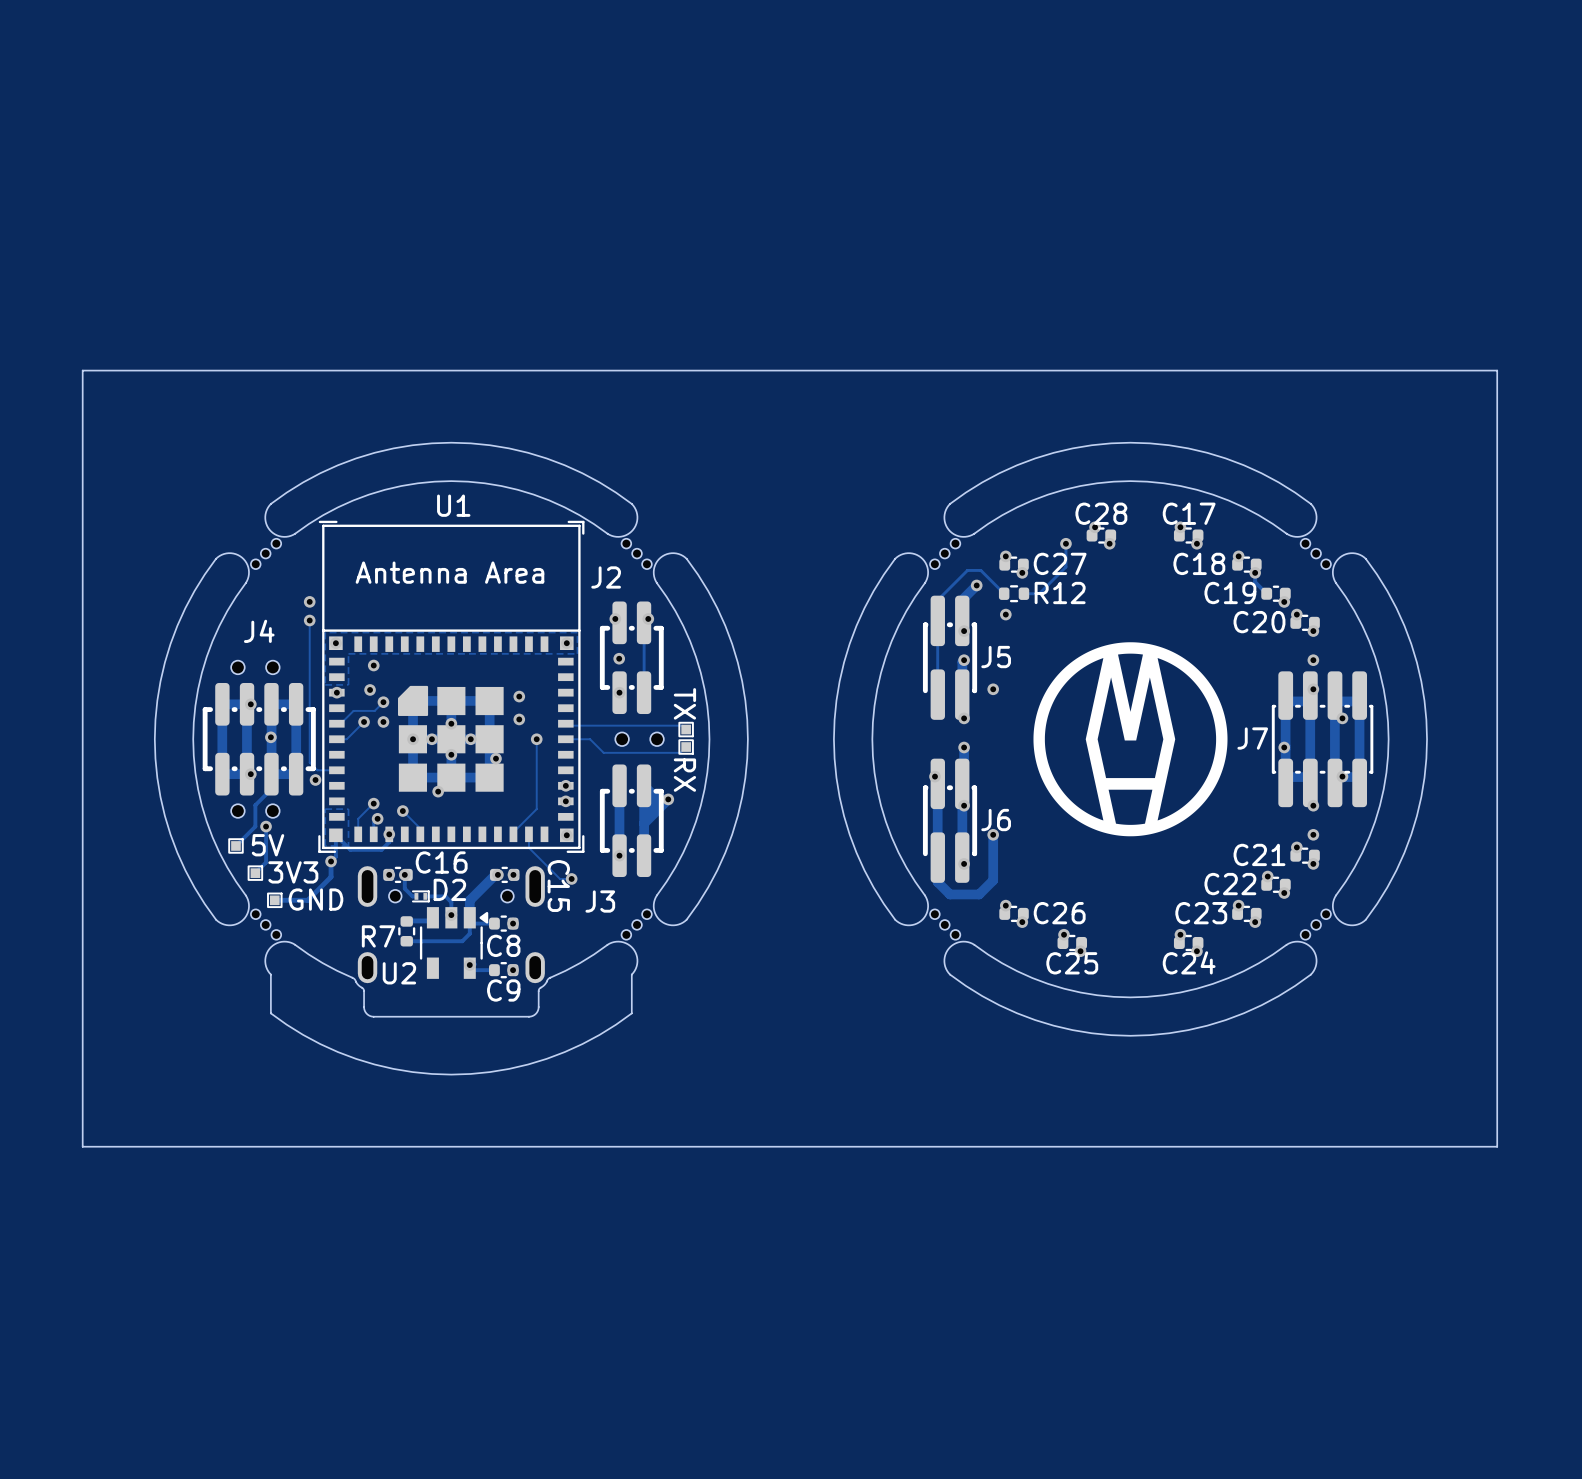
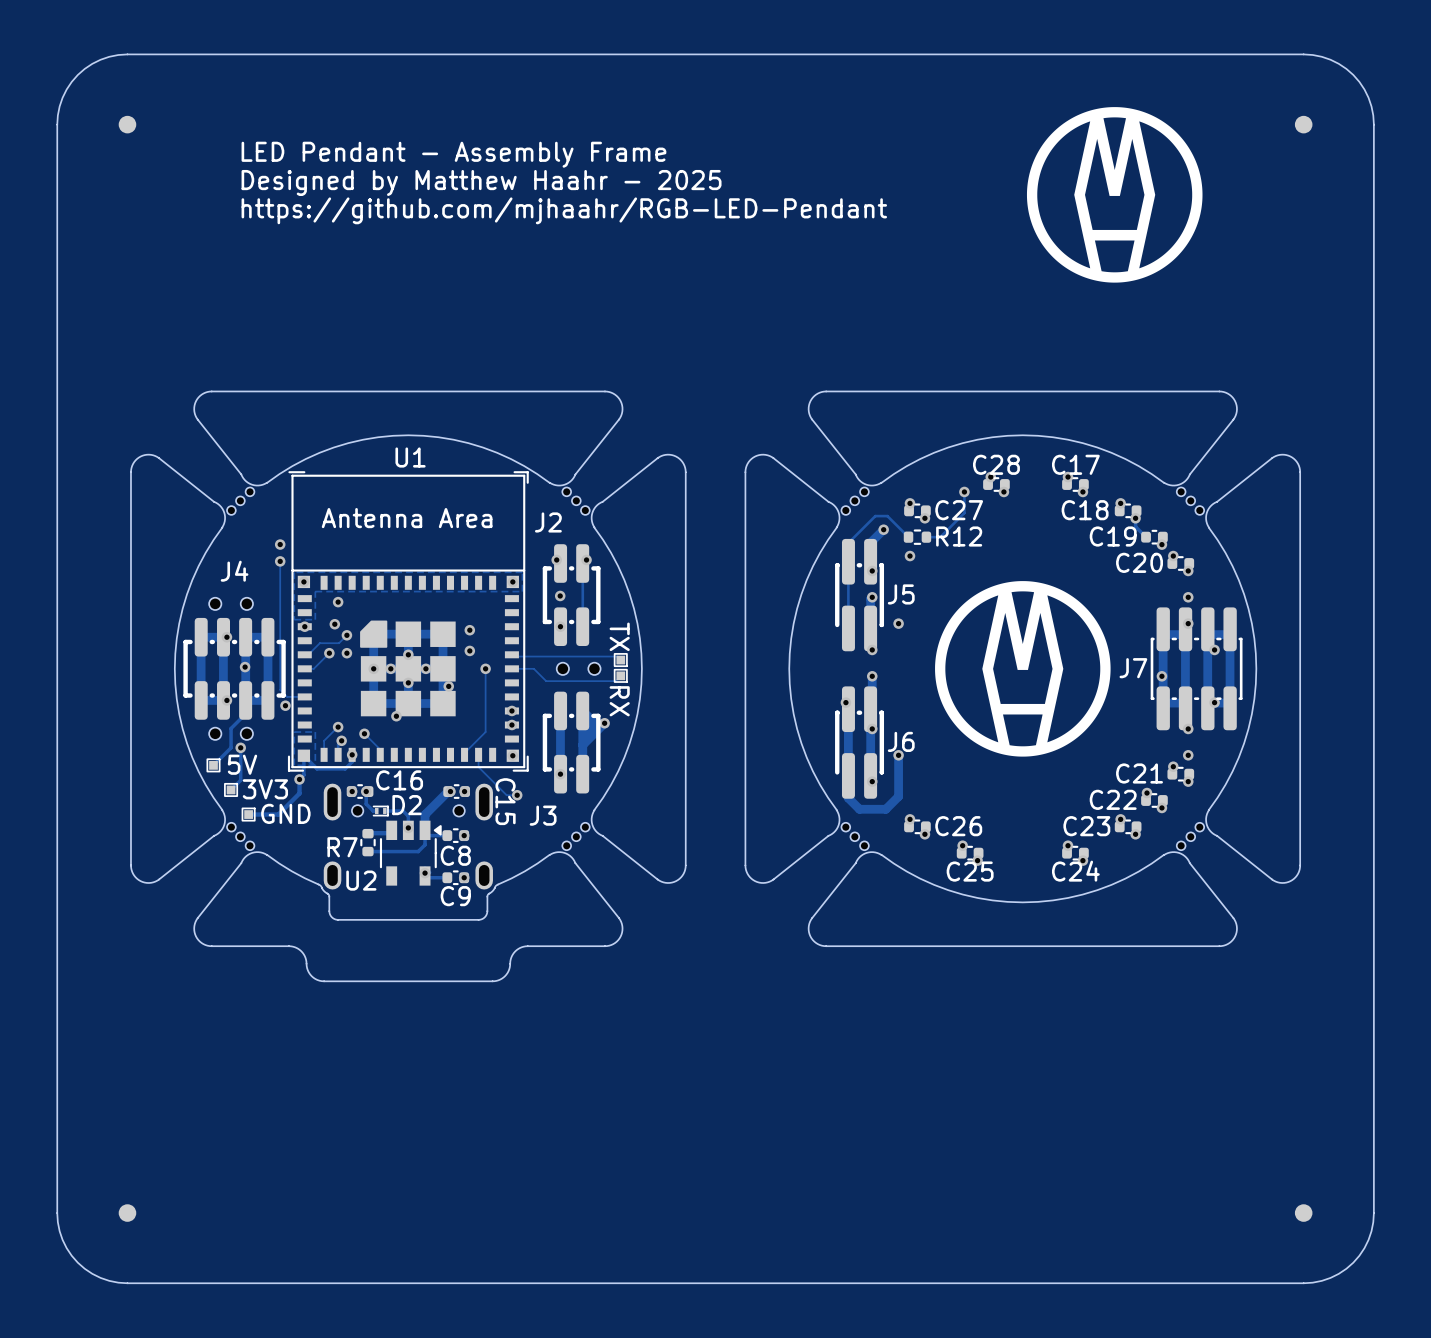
drawing: none -> [1026, 107, 1203, 283]
part: none -> (127, 124)
part: none -> (1303, 124)
text: none -> LED Pendant - Assembly Frame (453, 154)
text: none -> Designed by Matthew Haahr - 2025 (481, 182)
text: none -> https://github.com/mjhaahr/RGB-LED-Pendant (564, 210)
board edge: (1497, 370) (82, 370) (82, 1146) (1497, 1146) (1497, 370) -> (1303, 54) (1330, 59) (1353, 74) (1368, 97) (1373, 124) (1373, 1213) (1368, 1239) (1353, 1262) (1330, 1277) (1303, 1283) (127, 1283) (100, 1277) (77, 1262) (62, 1239) (57, 1213) (57, 124) (62, 97) (77, 74) (100, 59) (127, 54) (1303, 54)
part footprint: [215, 503, 296, 584] -> [213, 474, 268, 528]
part footprint: [607, 503, 688, 584] -> [549, 474, 604, 528]
board edge: (631, 503) (582, 473) (546, 458) (509, 448) (451, 442) (393, 448) (356, 458) (303, 482) (270, 503) -> none
part footprint: [894, 503, 975, 584] -> [828, 474, 882, 528]
part footprint: [1286, 503, 1367, 584] -> [1163, 474, 1218, 528]
board edge: (1310, 503) (1261, 473) (1225, 458) (1169, 445) (1130, 442) (1072, 448) (1035, 458) (999, 473) (950, 503) -> none
board edge: none -> (575, 474) (621, 415) (622, 409) (620, 401) (611, 392) (205, 392) (196, 401) (194, 409) (195, 415) (241, 474)
board edge: none -> (1189, 474) (1235, 415) (1236, 409) (1235, 401) (1225, 392) (819, 392) (810, 401) (808, 409) (809, 415) (855, 474)
board edge: none -> (214, 501) (155, 456) (149, 454) (140, 456) (132, 465) (132, 871) (140, 881) (149, 883) (155, 881) (214, 835)
board edge: none -> (602, 501) (661, 456) (667, 454) (676, 456) (684, 465) (684, 871) (676, 881) (667, 883) (661, 881) (602, 835)
board edge: none -> (828, 501) (769, 456) (763, 454) (755, 456) (746, 465) (746, 871) (755, 881) (763, 883) (769, 881) (828, 835)
board edge: none -> (1217, 501) (1275, 456) (1282, 454) (1290, 456) (1298, 465) (1298, 871) (1290, 881) (1282, 883) (1275, 881) (1217, 835)
board edge: (216, 558) (194, 591) (170, 643) (157, 700) (154, 739) (160, 797) (170, 834) (194, 887) (216, 919) -> none
board edge: (686, 558) (708, 591) (732, 643) (745, 700) (747, 739) (742, 797) (732, 834) (717, 870) (686, 919) -> none
board edge: (895, 558) (873, 591) (849, 643) (836, 700) (833, 739) (839, 797) (849, 834) (864, 870) (895, 919) -> none
board edge: (1365, 558) (1396, 608) (1411, 643) (1424, 700) (1427, 739) (1424, 777) (1411, 834) (1387, 887) (1365, 919) -> none
part footprint: [215, 894, 296, 976] -> [213, 809, 268, 864]
part footprint: [607, 894, 688, 976] -> [549, 809, 604, 864]
part footprint: [894, 894, 975, 976] -> [828, 809, 882, 864]
part footprint: [1286, 894, 1367, 976] -> [1163, 809, 1218, 864]
board edge: none -> (575, 863) (620, 919) (622, 928) (619, 938) (613, 944) (607, 946) (521, 947) (512, 954) (506, 974) (500, 979) (492, 981) (321, 981) (310, 974) (303, 954) (294, 947) (211, 946) (203, 944) (195, 934) (195, 921) (241, 863)
board edge: none -> (1189, 863) (1235, 921) (1236, 928) (1235, 936) (1225, 945) (819, 945) (810, 936) (808, 928) (809, 921) (855, 863)
board edge: (631, 974) (631, 1013) (599, 1034) (564, 1052) (528, 1064) (490, 1072) (451, 1074) (412, 1072) (374, 1064) (337, 1052) (303, 1034) (270, 1013) (270, 974) -> none
board edge: (1310, 974) (1261, 1005) (1225, 1020) (1188, 1030) (1130, 1035) (1072, 1030) (1035, 1020) (982, 996) (950, 974) -> none
part: none -> (127, 1213)
part: none -> (1303, 1213)

